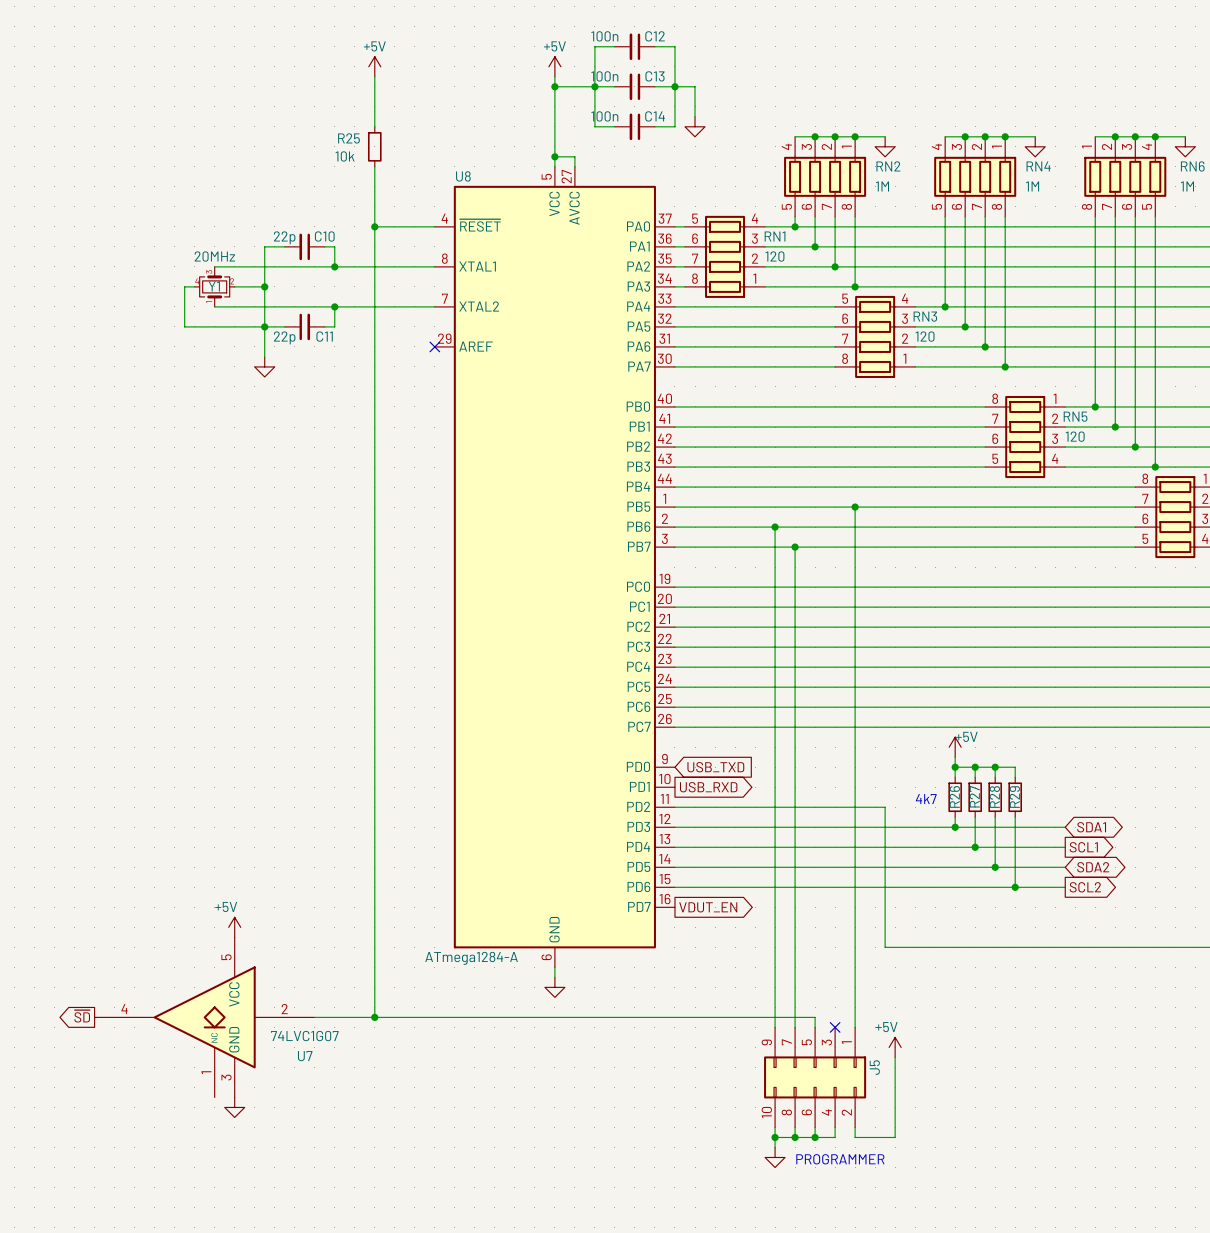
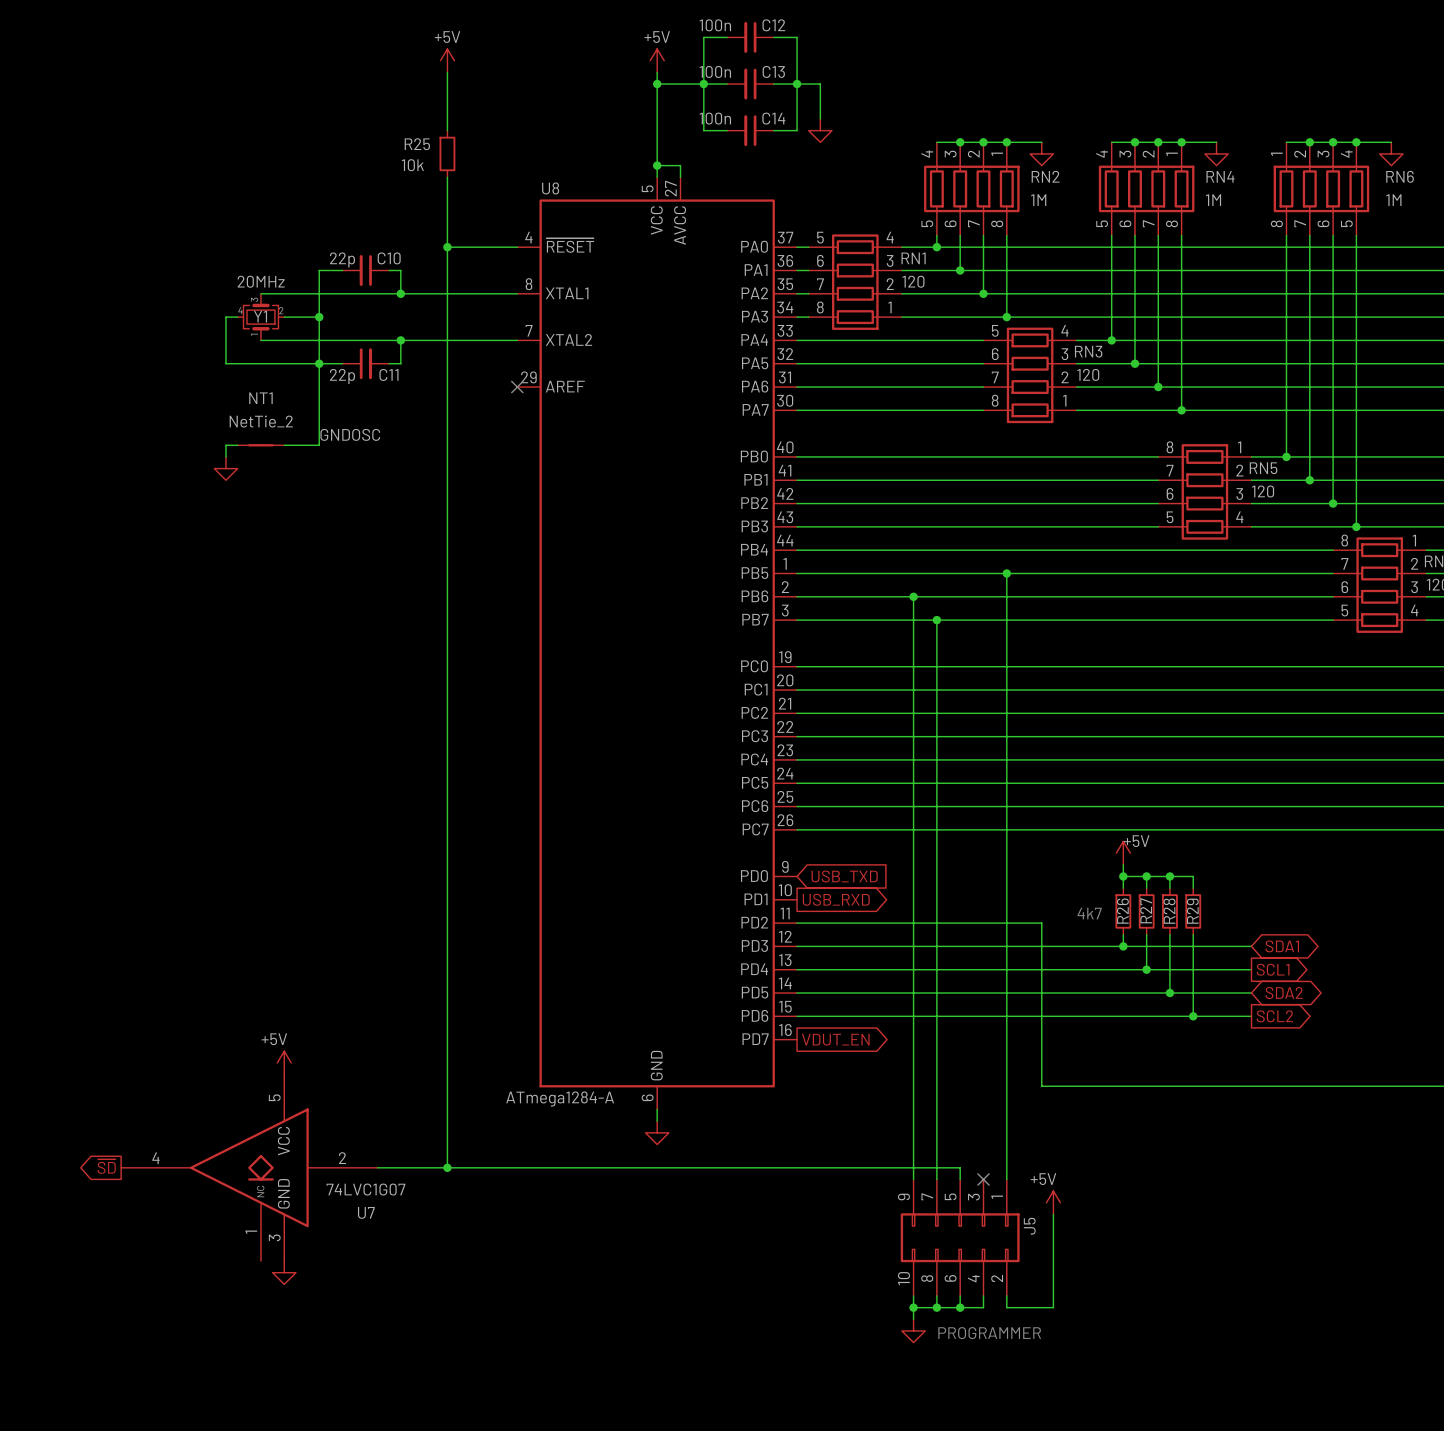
wire: none -> (319, 398) (319, 445) (284, 445)
power symbol position: (264, 366) -> (226, 468)
label: none -> GNDOSC (350, 434)
wire: none -> (237, 445) (226, 445) (226, 456)
NT1: none -> NetTie_2 (260, 445)

